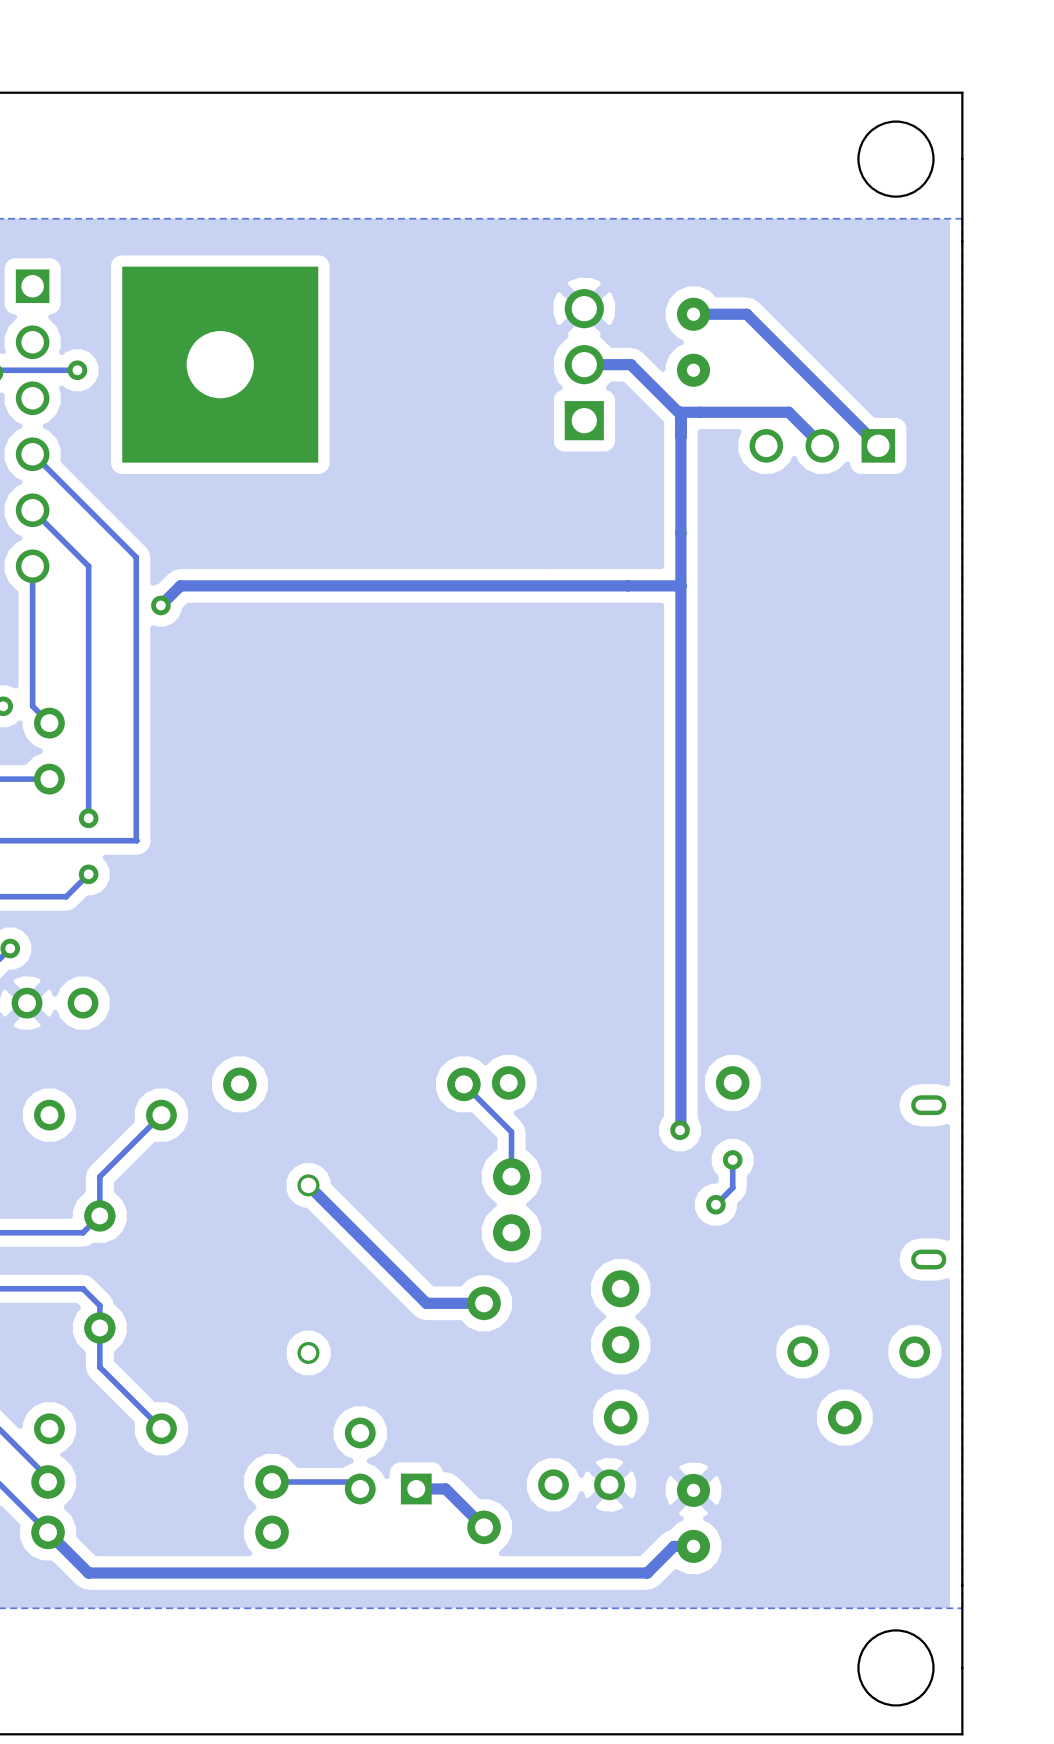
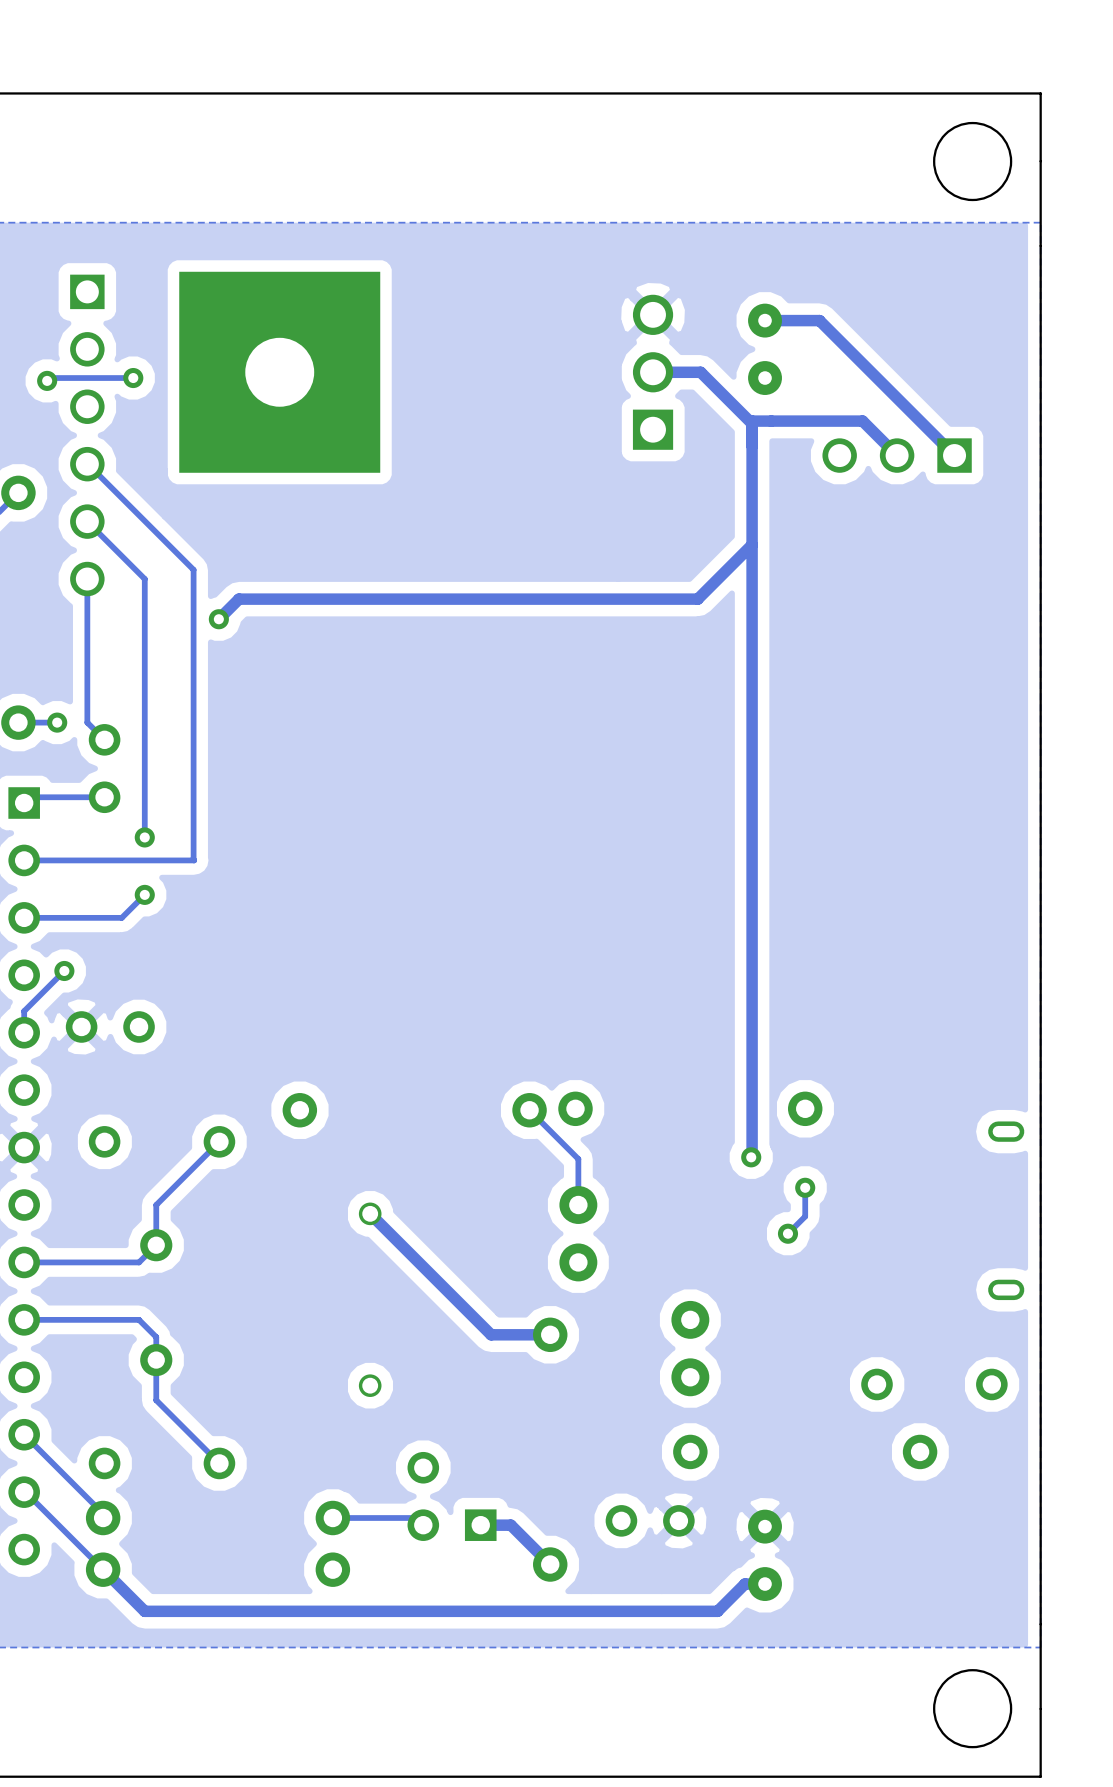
track: (680, 585) (627, 585) -> (752, 544) (697, 599)

